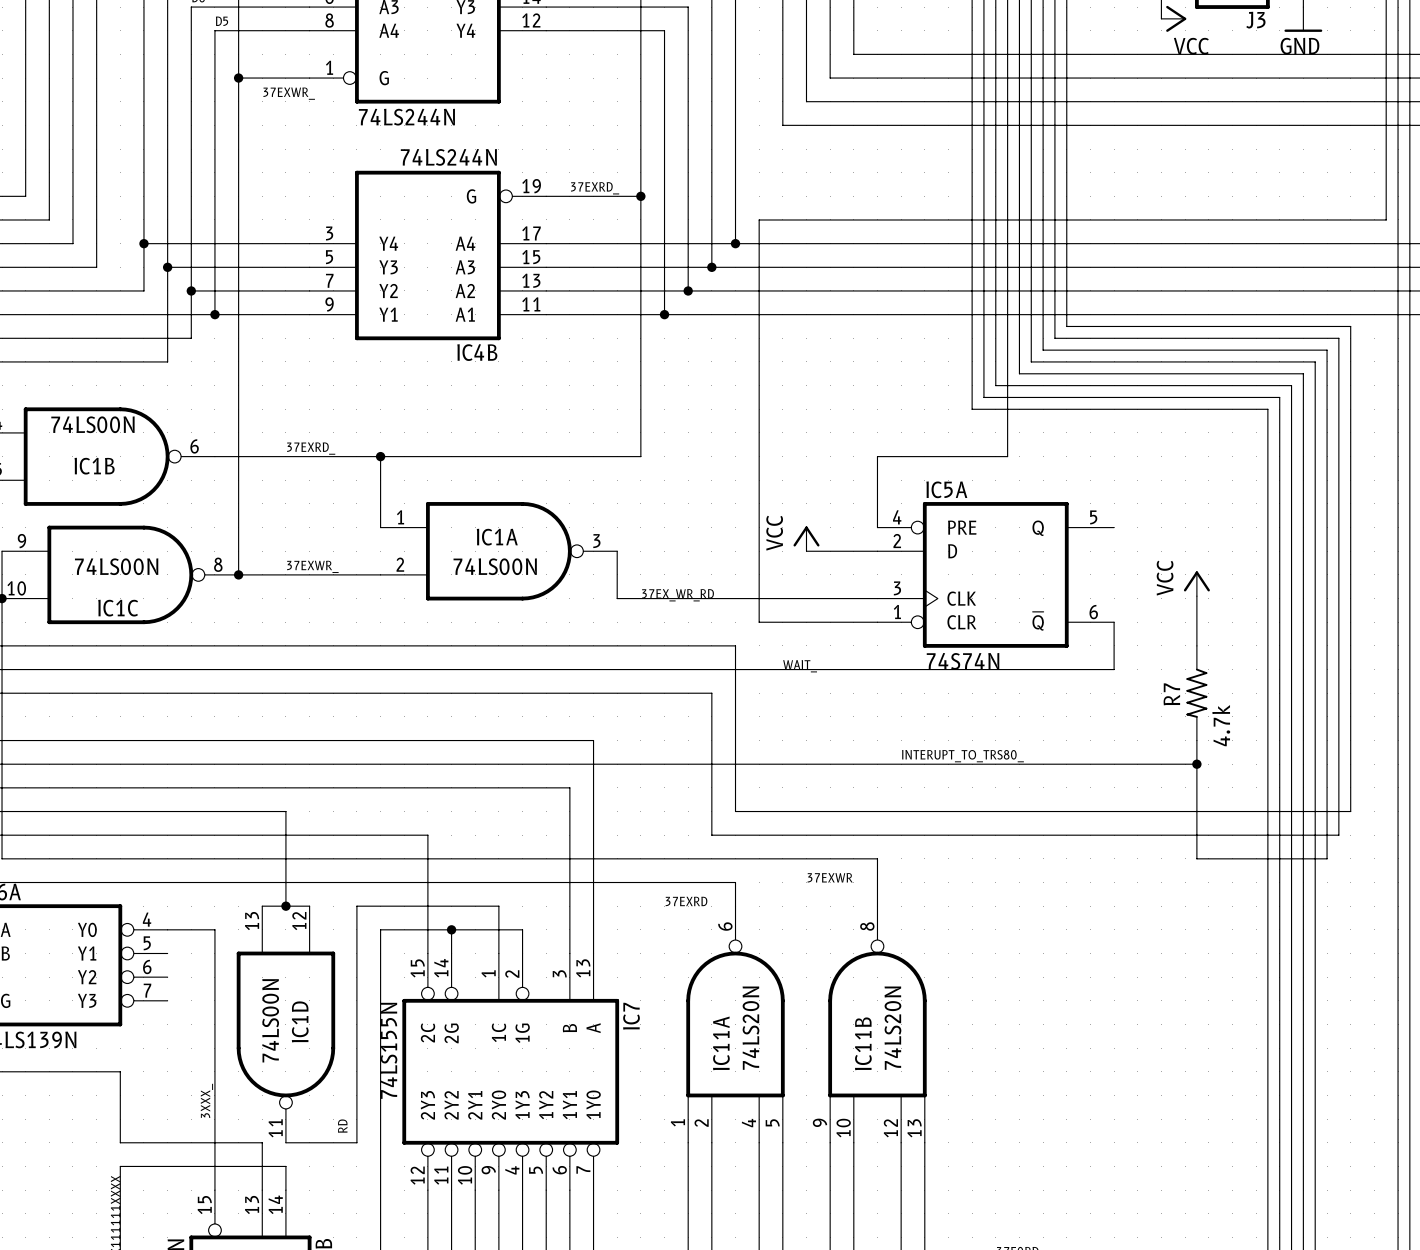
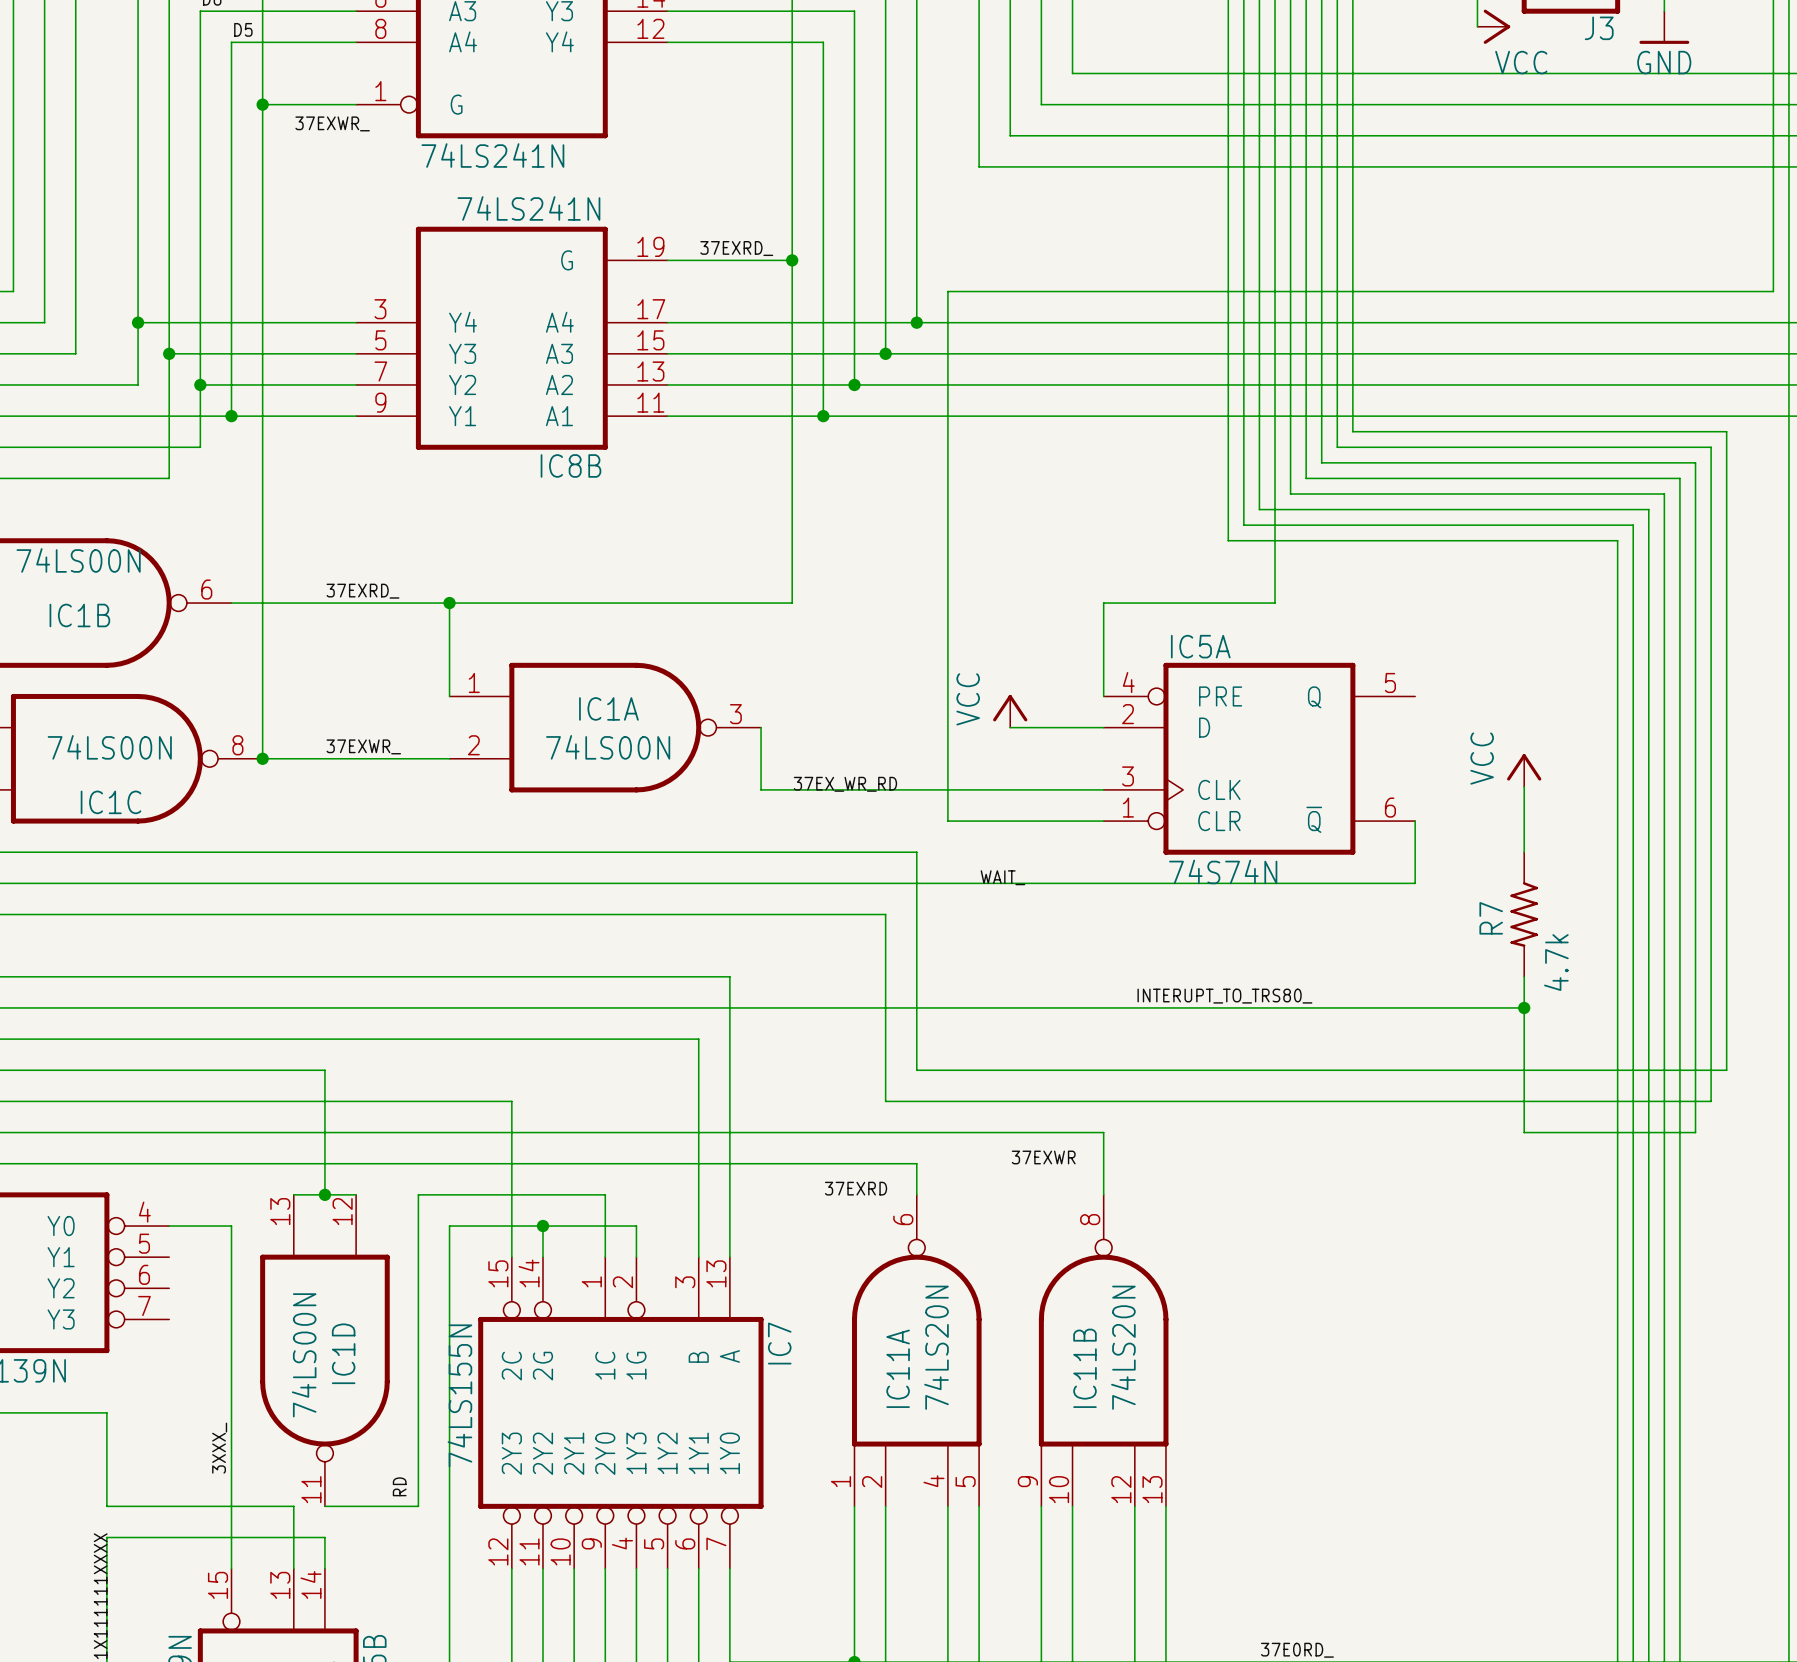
part value: 74LS244N (406, 117) -> 74LS241N (492, 155)
IC4B: 74LS244N (427, 255) -> none
IC8B: none -> 74LS241N (511, 338)

